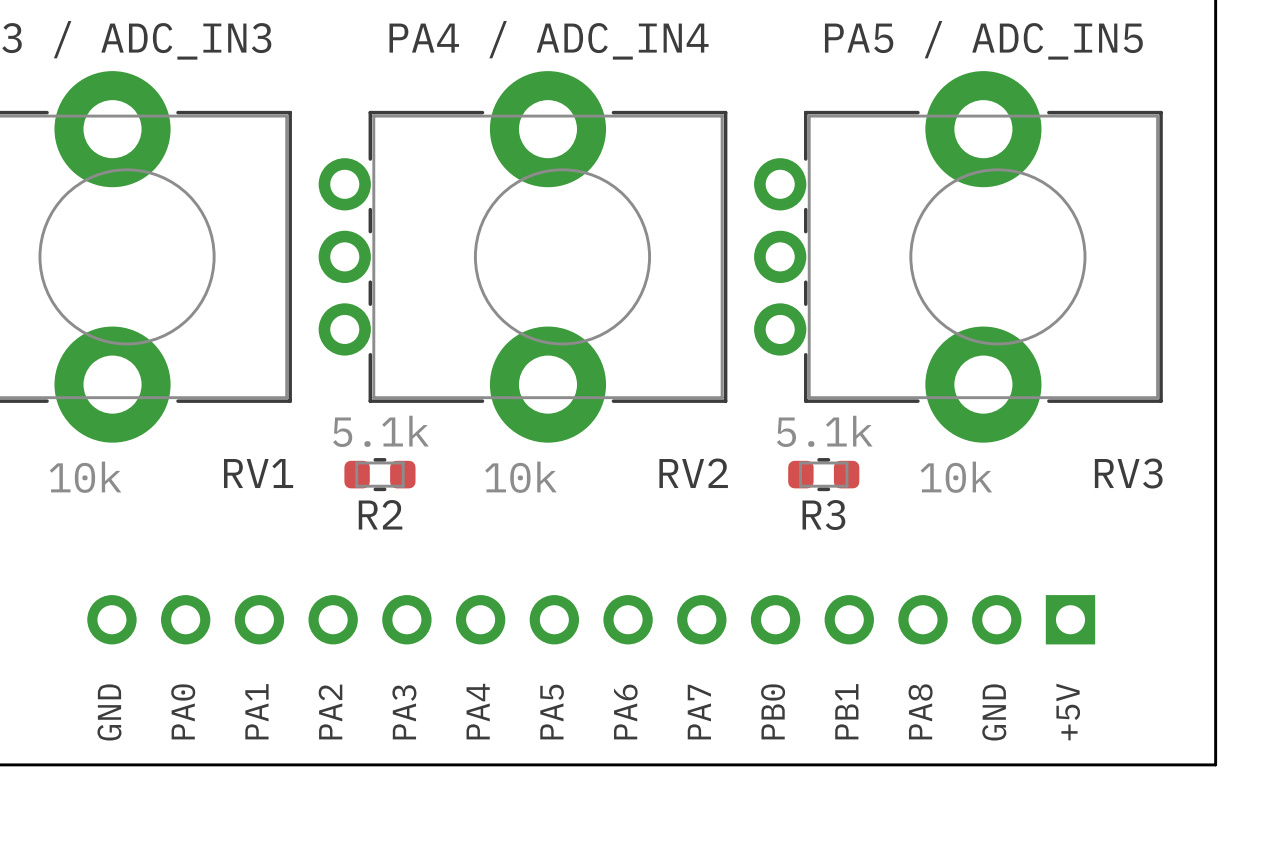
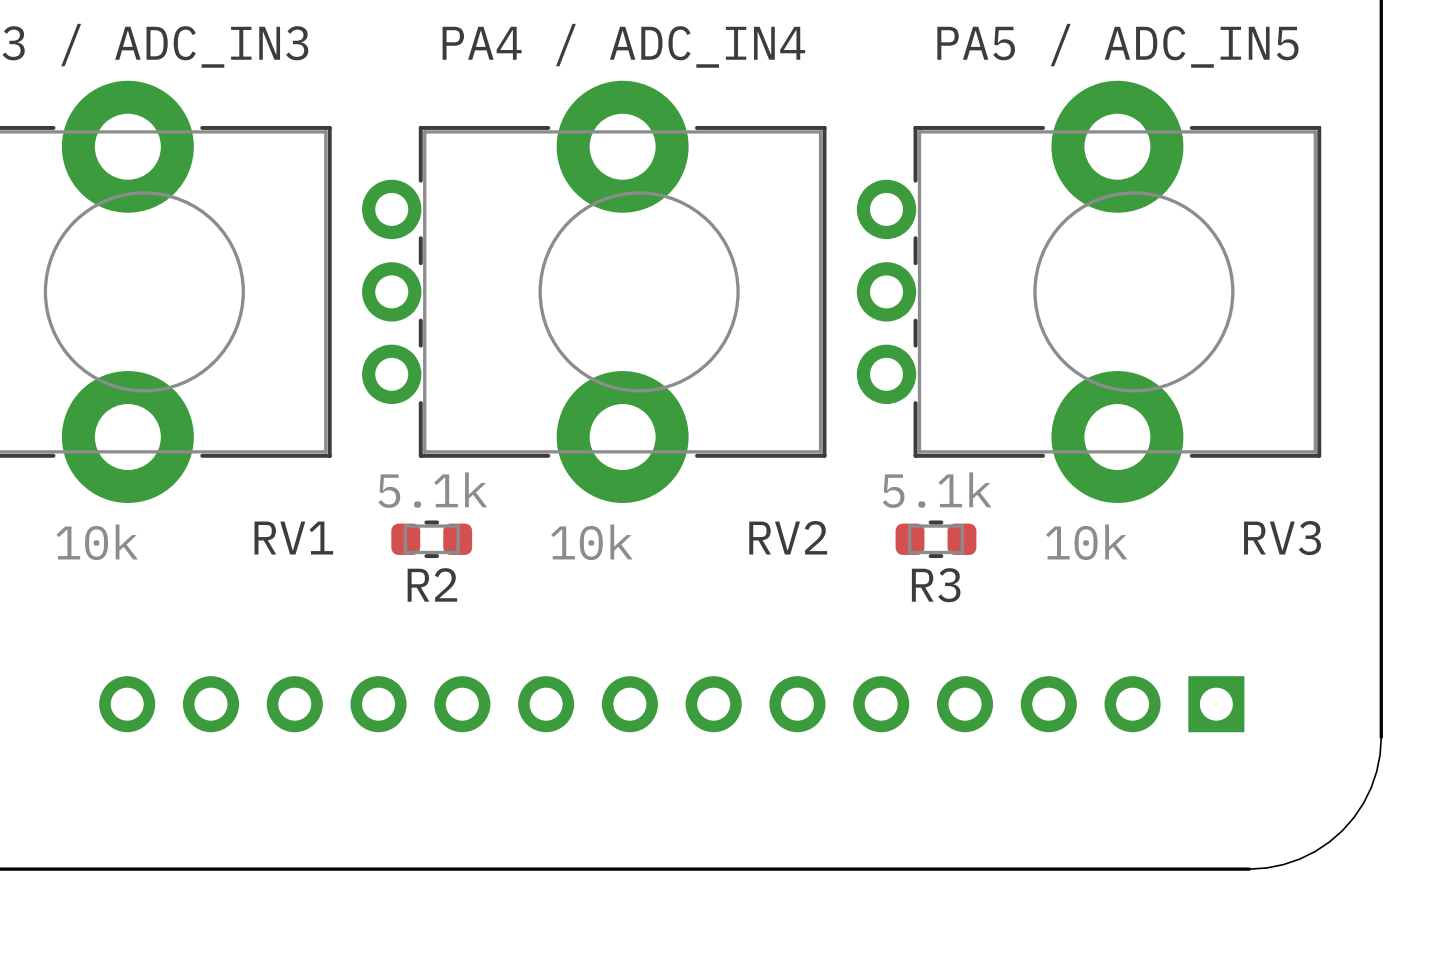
part footprint: [87, 595, 1096, 645] -> [99, 676, 1245, 733]
board edge: (1215, 648) (1215, 764) (1099, 764) -> (1381, 737) (1376, 771) (1371, 787) (1363, 803) (1342, 830) (1315, 851) (1299, 859) (1283, 864) (1249, 869)

